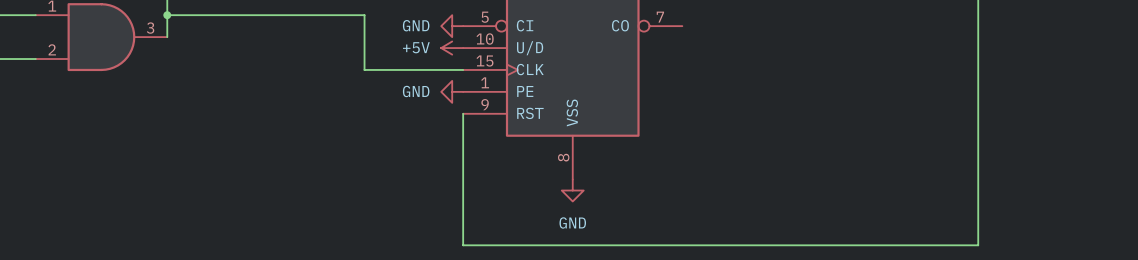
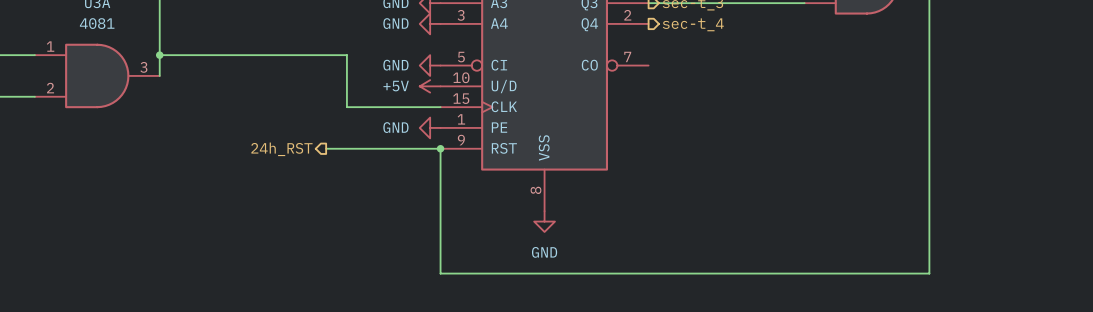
wire: none -> (326, 148) (440, 148)
junction: none -> (440, 148)
hierarchical label: none -> 24h_RST (281, 149)

